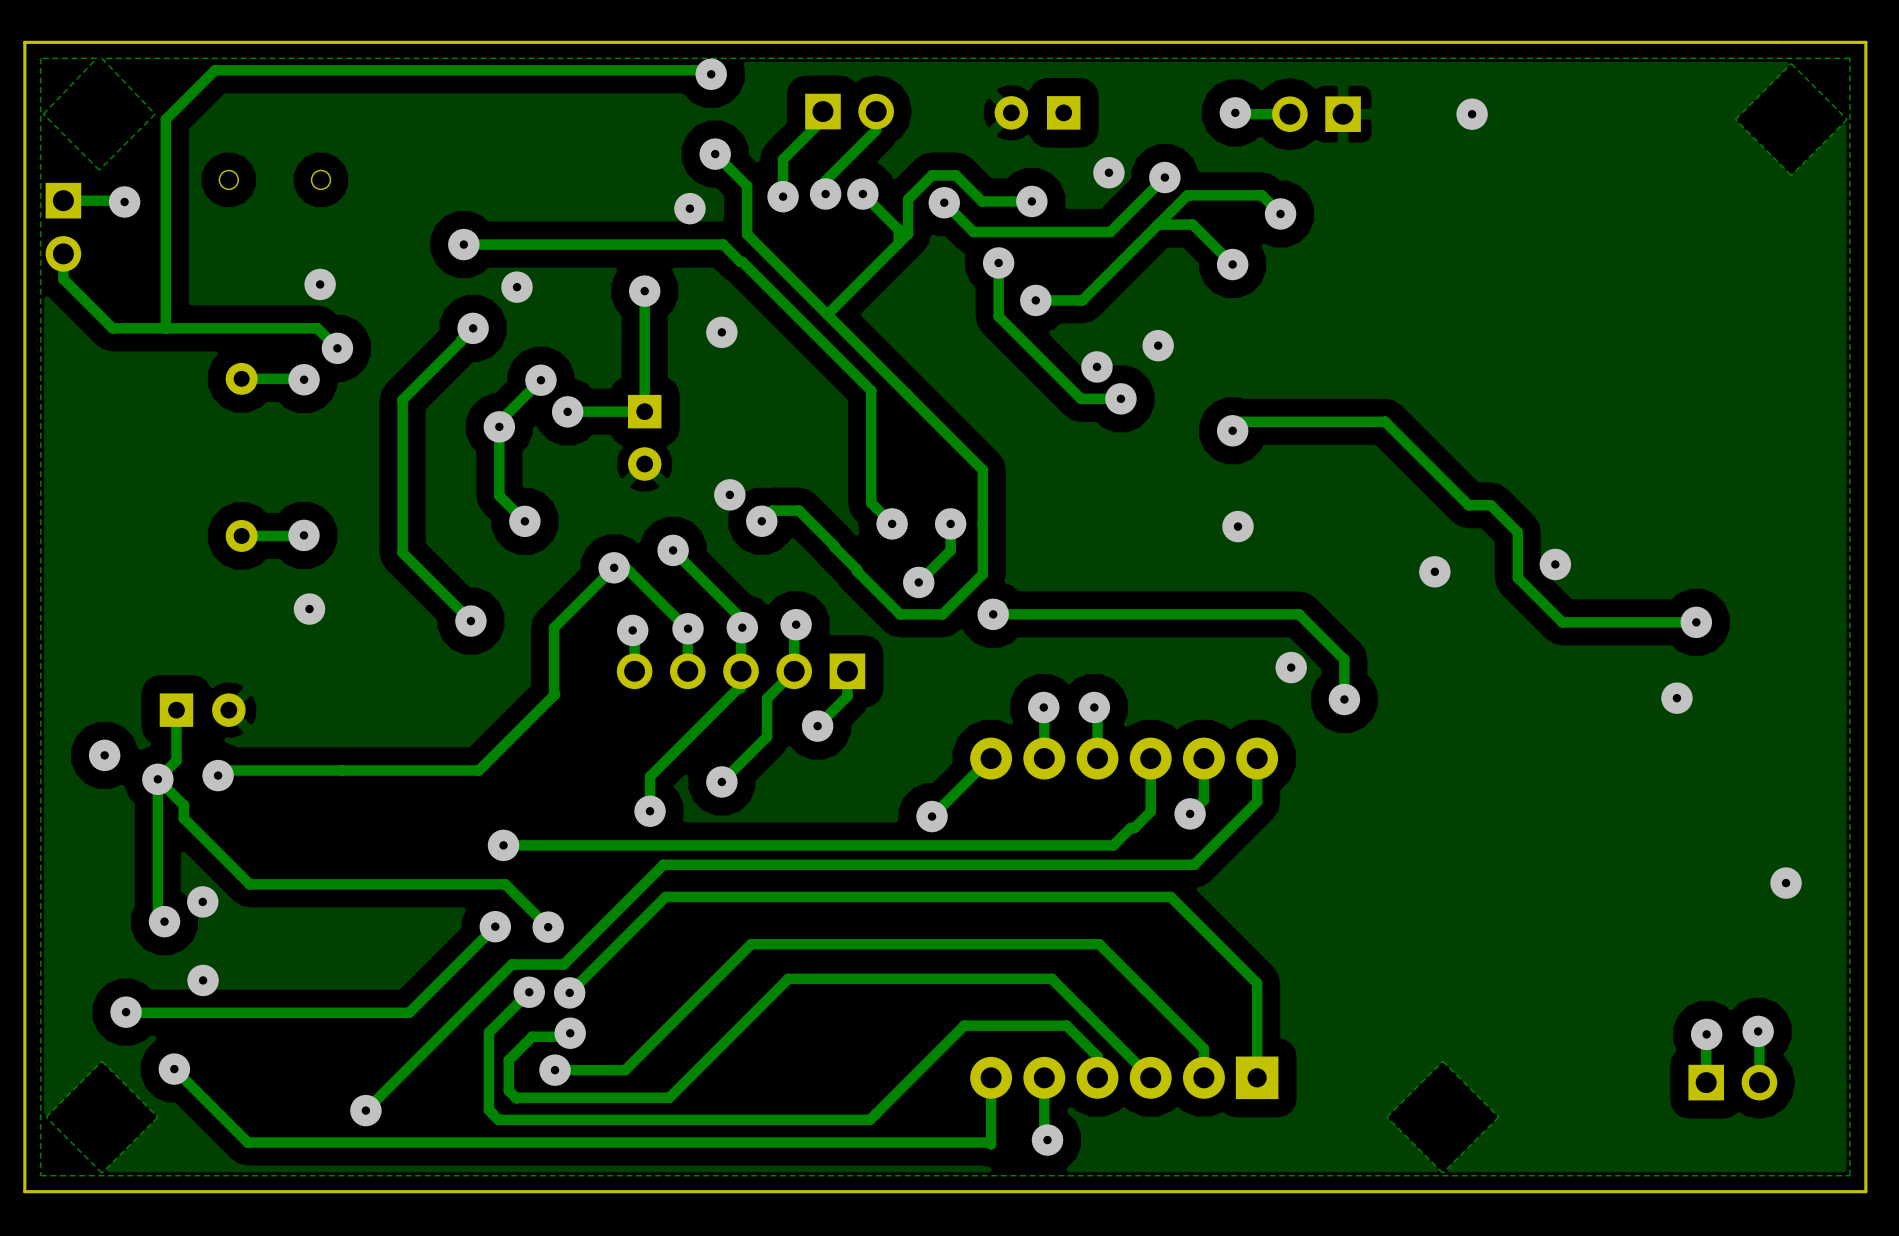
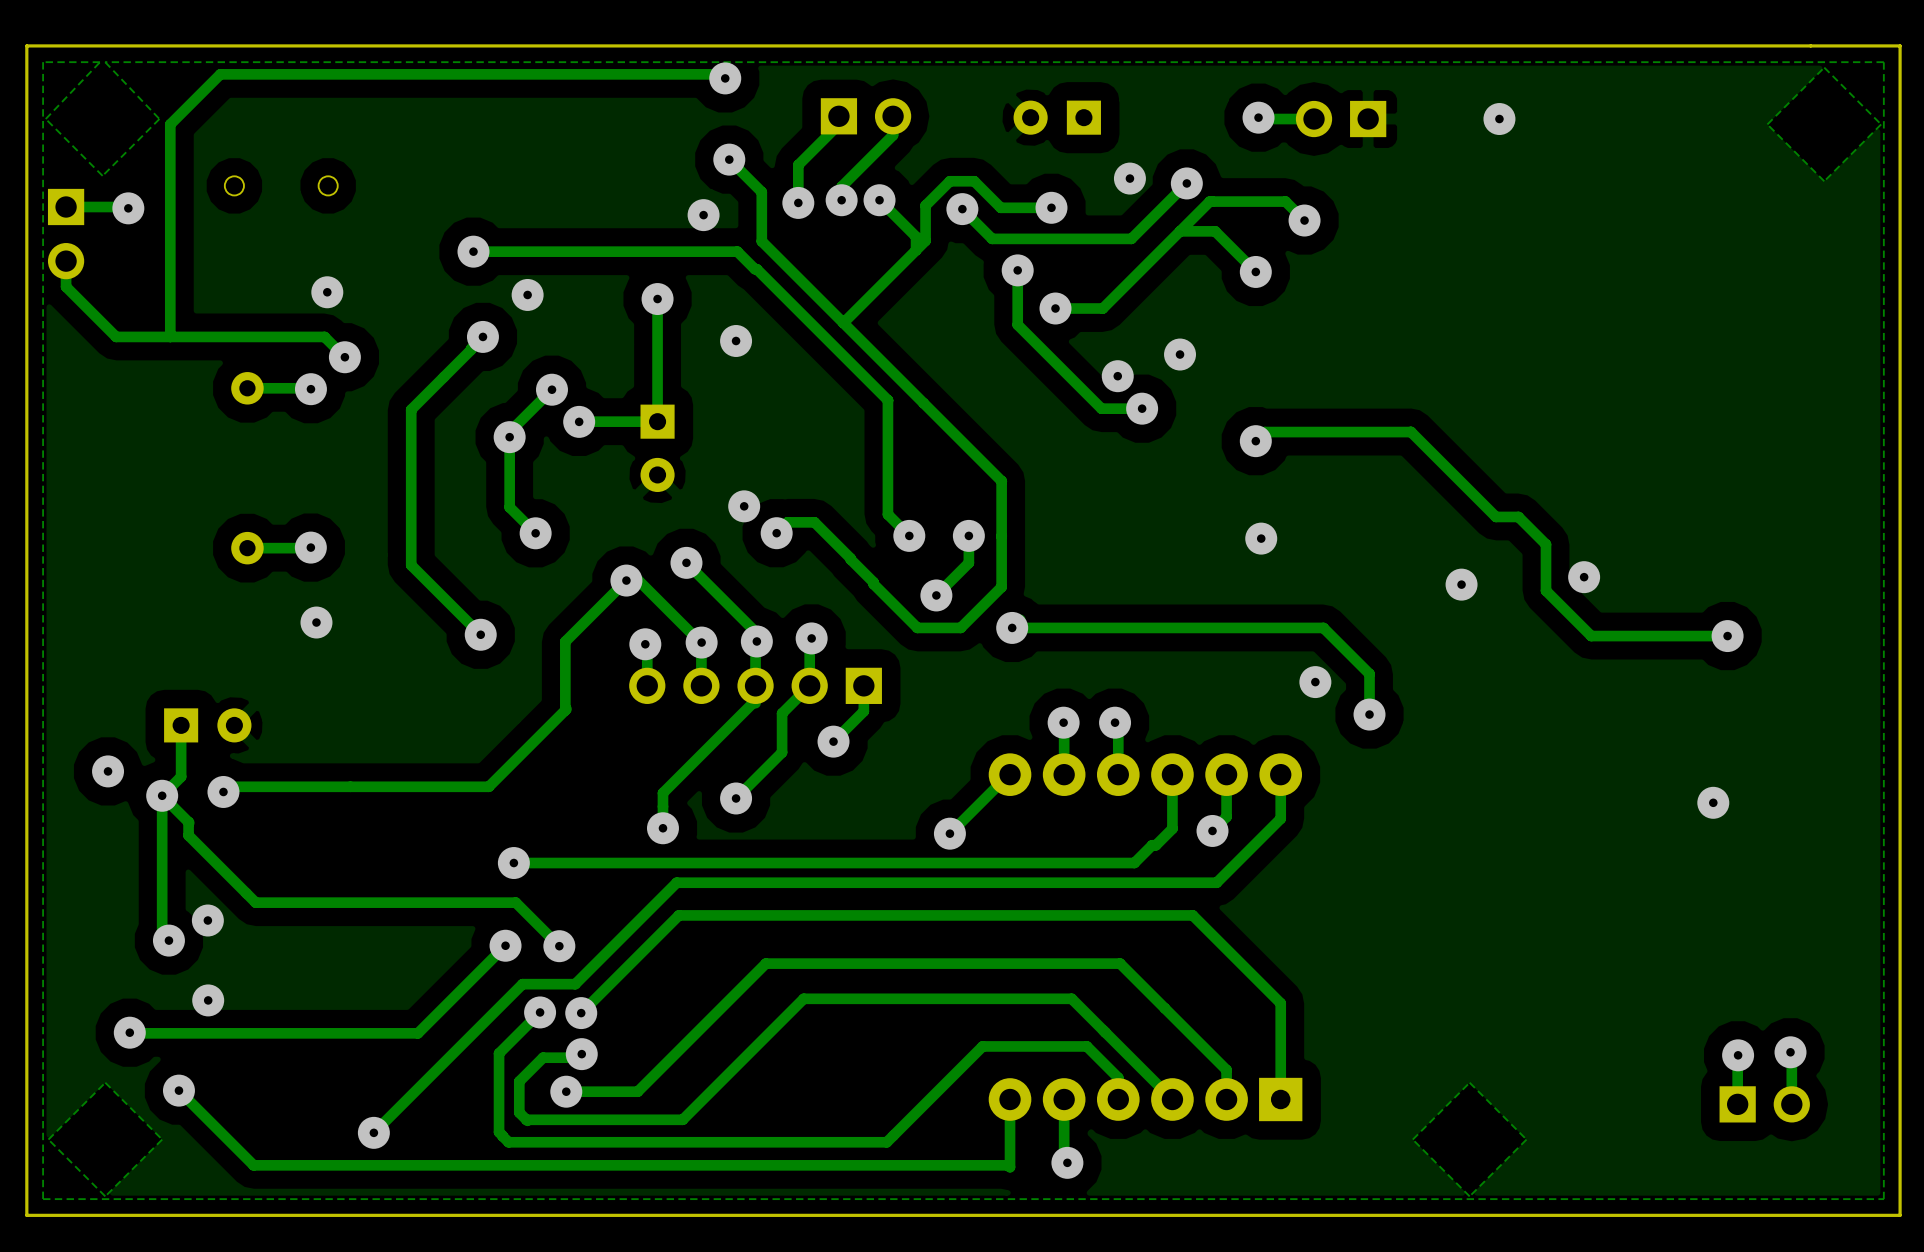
via: (1676, 698) -> none
via: none -> (1713, 802)
via: (1786, 883) -> none

